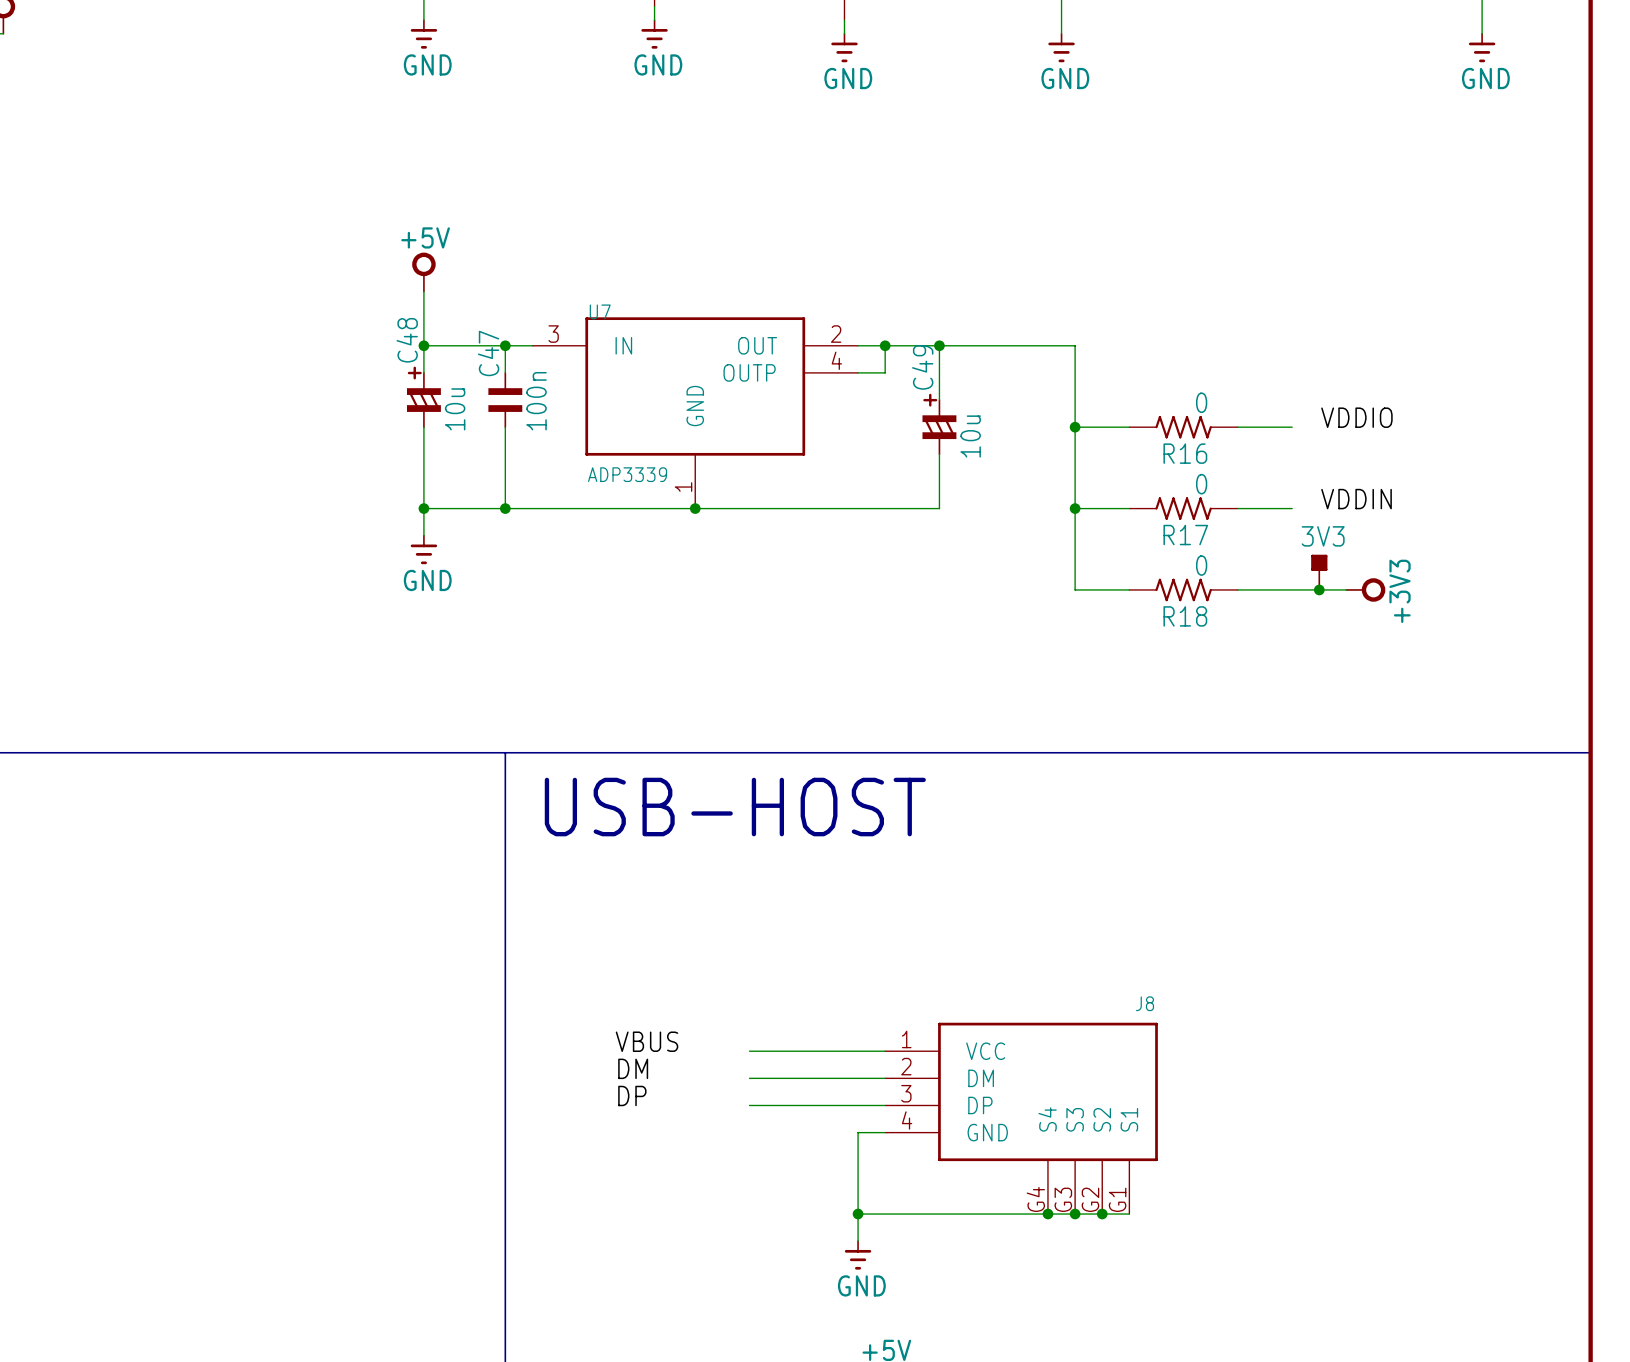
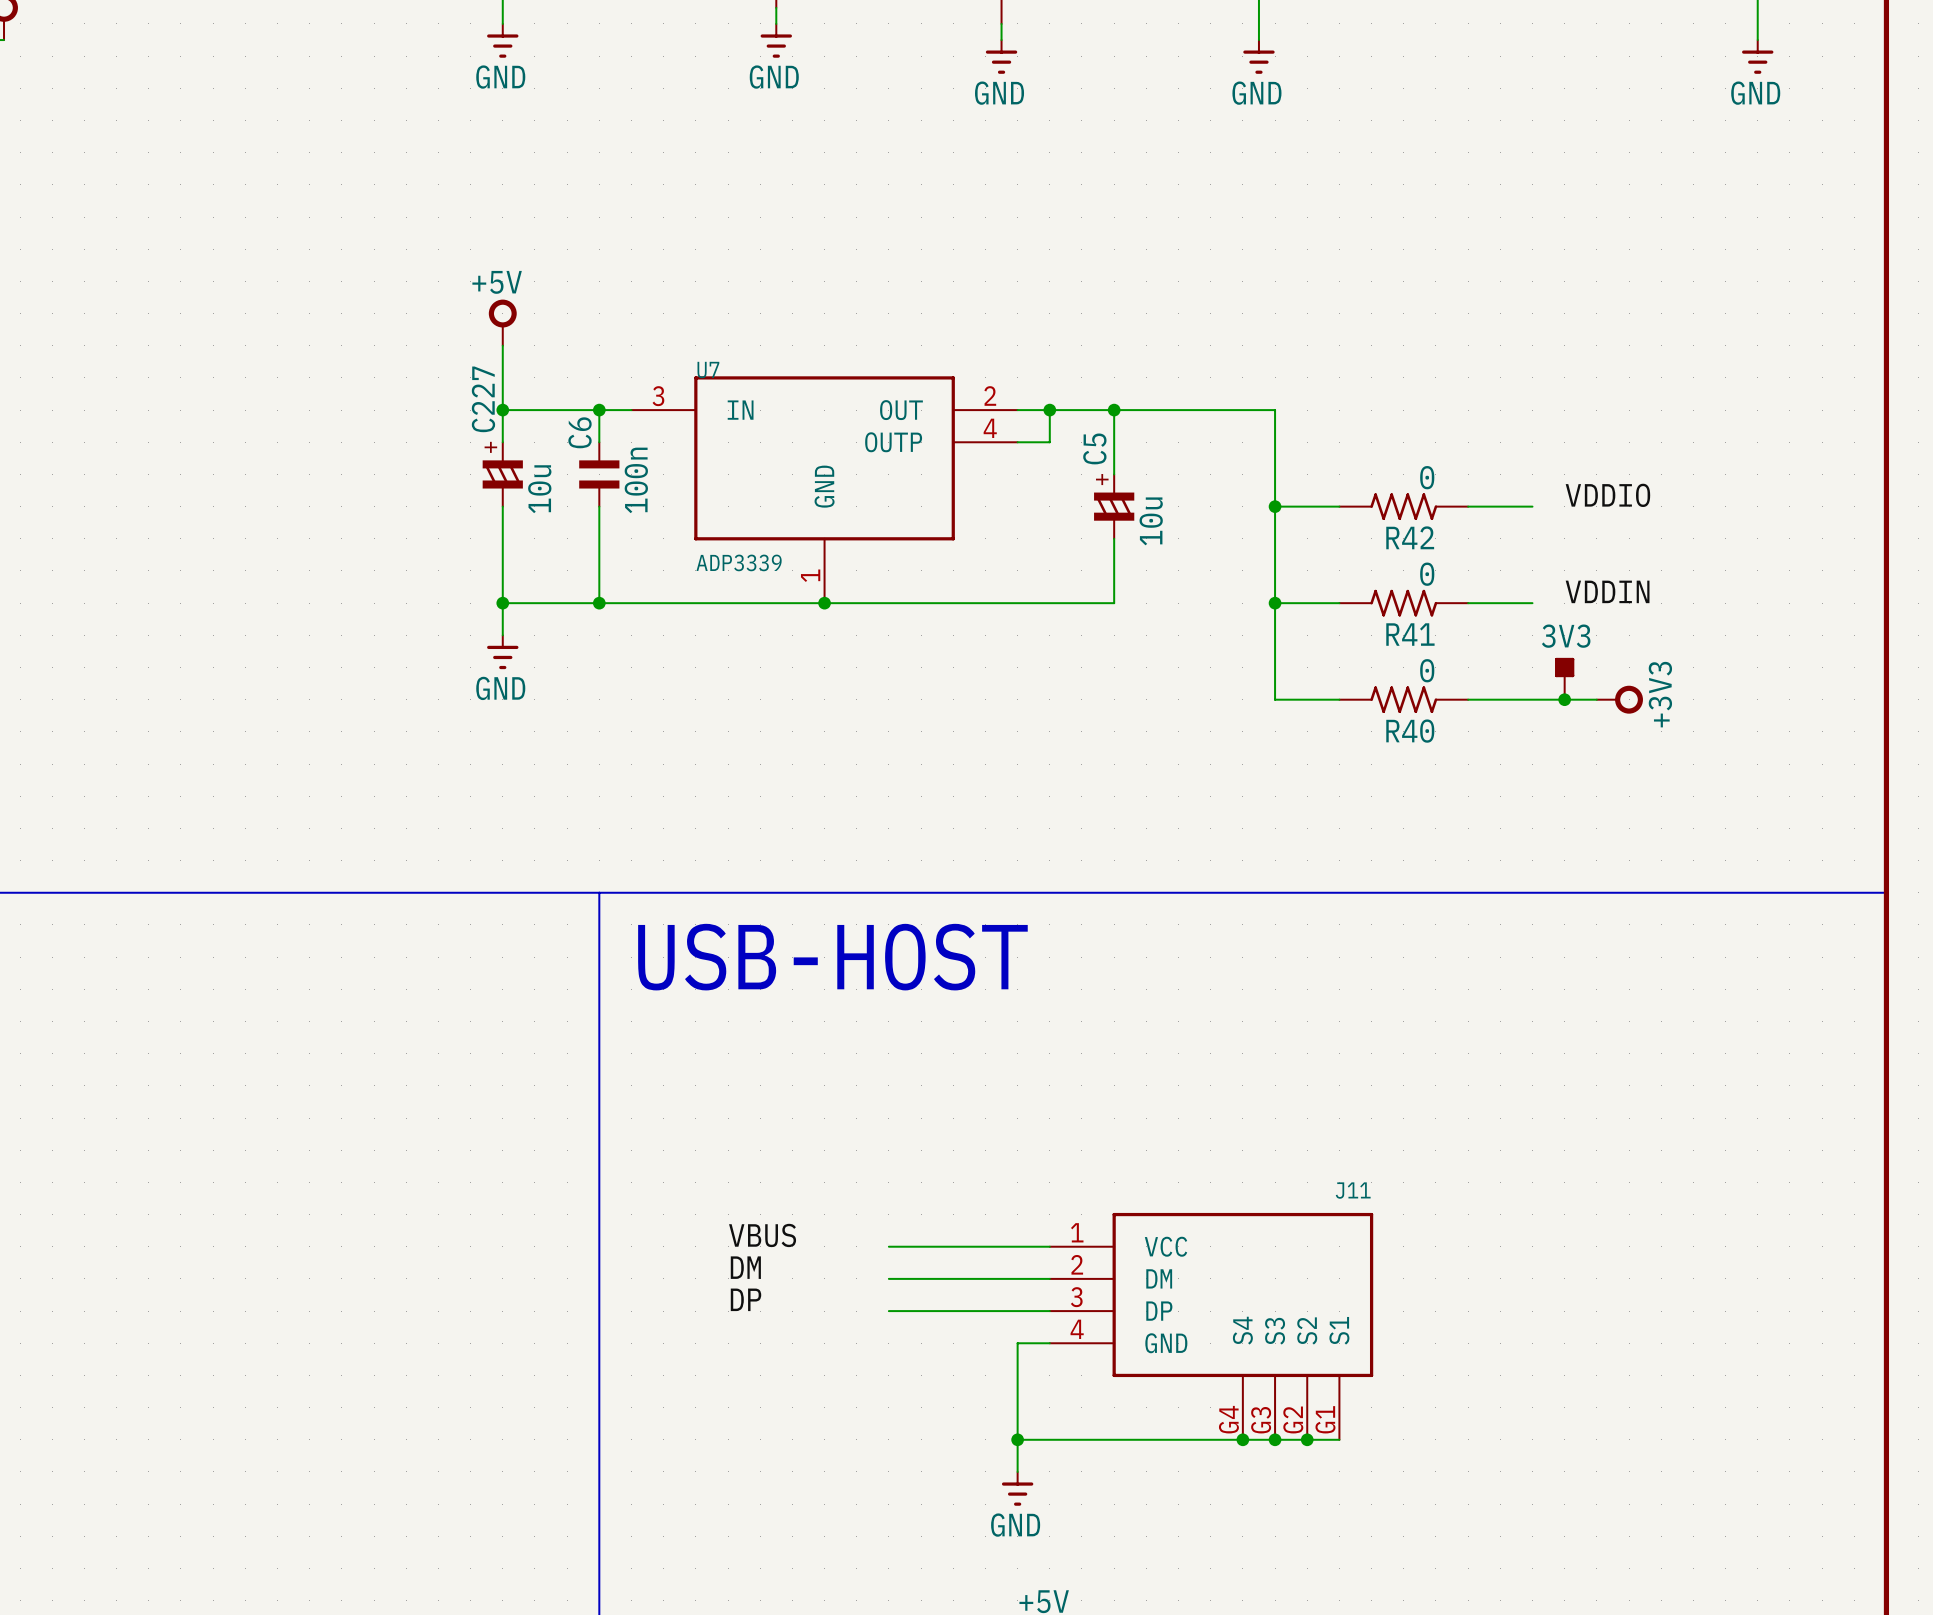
C48 name: C48 (407, 340) -> C227 (483, 399)
C47 name: C47 (488, 353) -> C6 (580, 432)
C49 name: C49 (922, 367) -> C5 (1094, 448)
R16 name: R16 (1185, 453) -> R42 (1410, 537)
R17 name: R17 (1185, 535) -> R41 (1410, 634)
R18 name: R18 (1185, 616) -> R40 (1410, 731)
J8 name: J8 (1145, 1003) -> J11 (1353, 1190)

